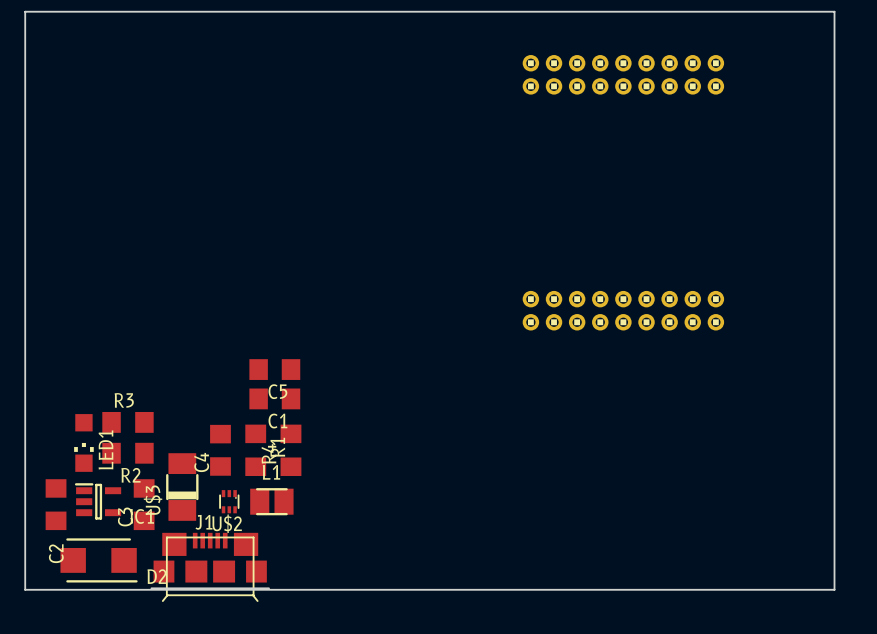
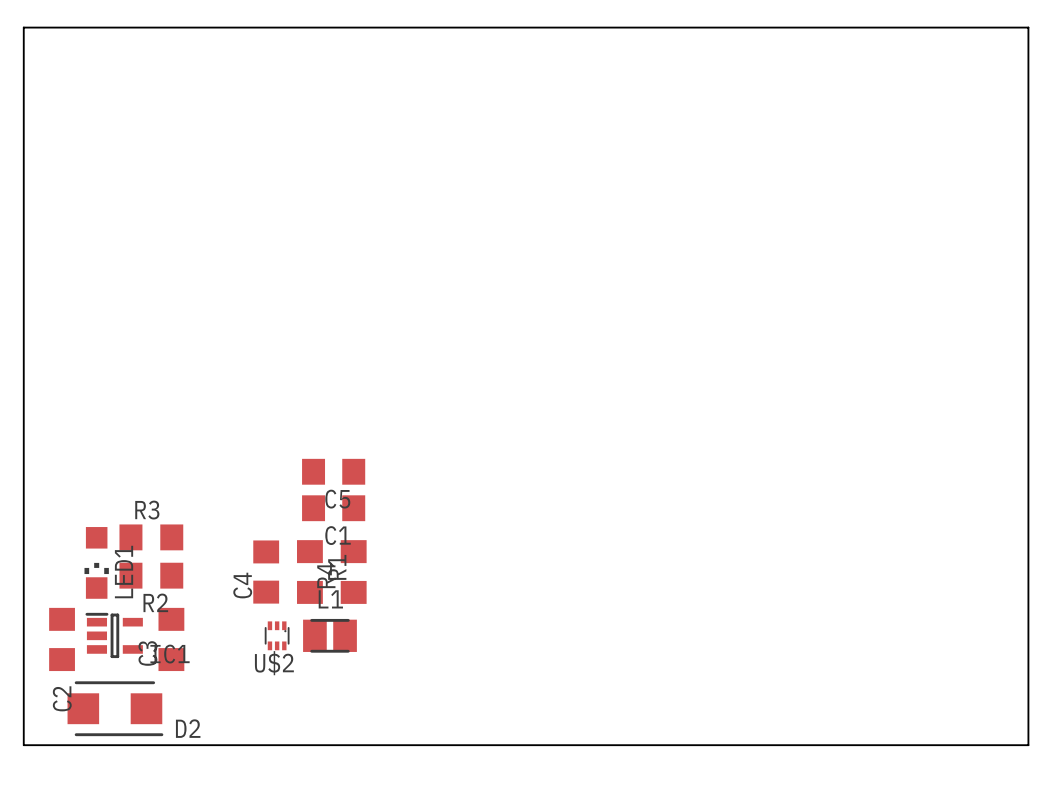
part: (623, 74) -> none
part: (623, 310) -> none
U$3: (182, 487) -> none
J1: (210, 567) -> none

